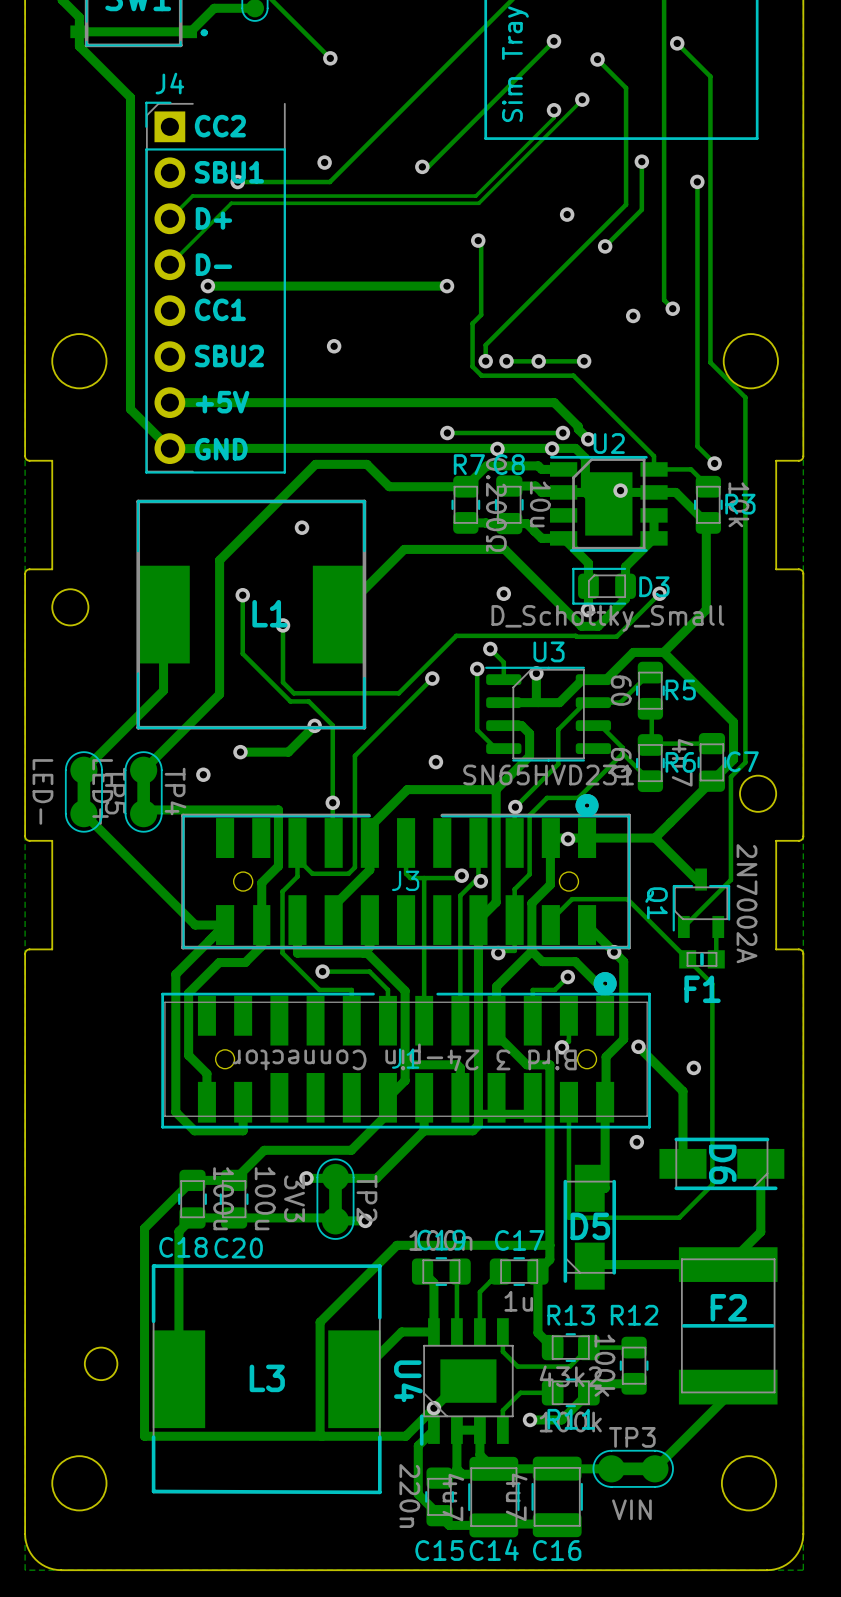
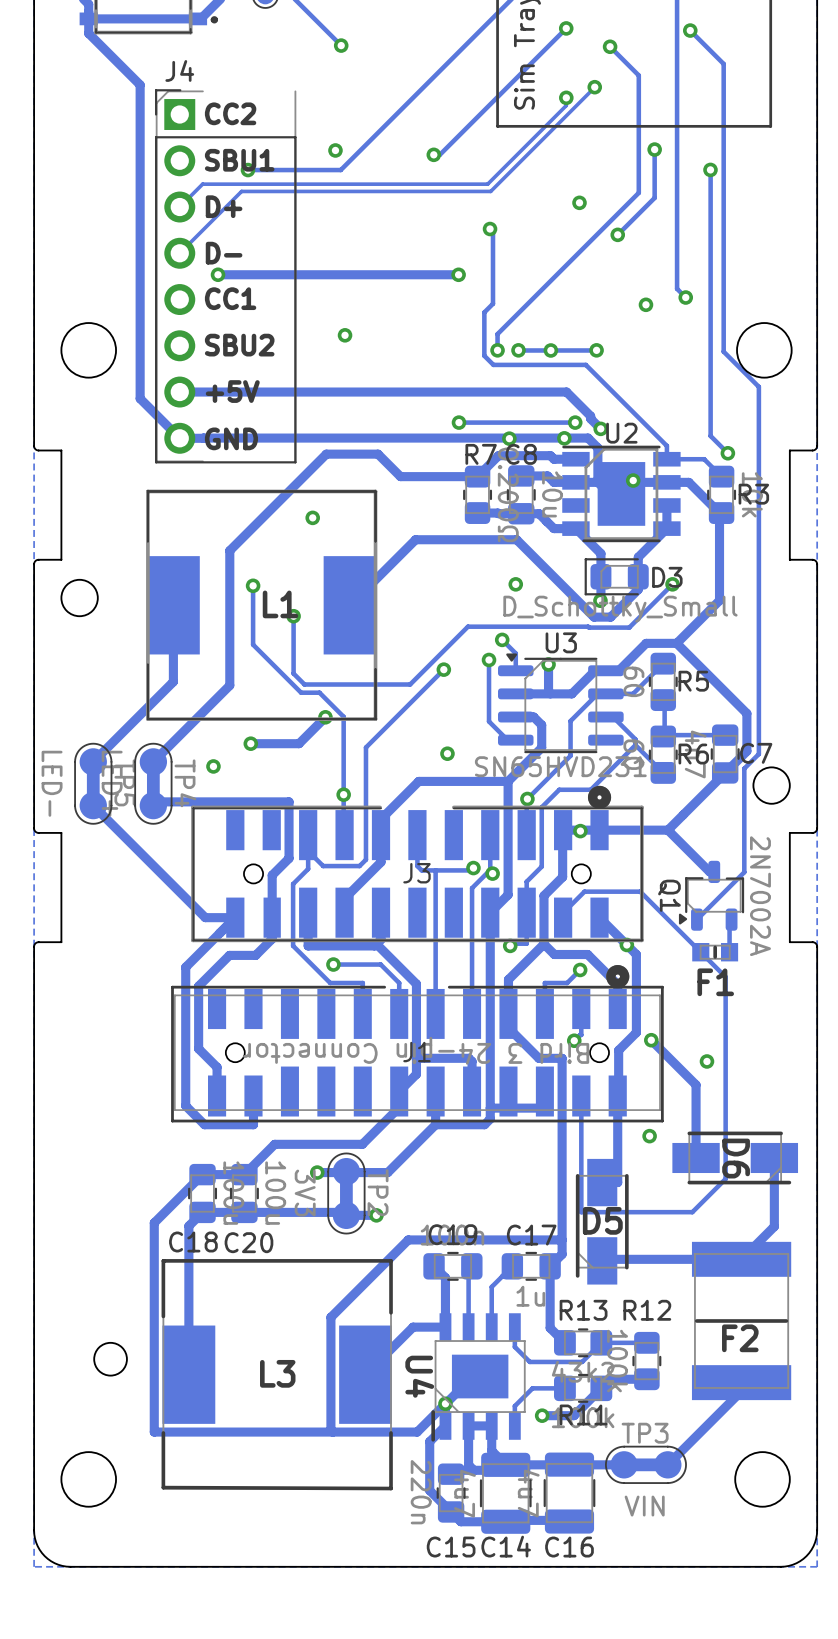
U3 footprint: [485, 666, 612, 762] -> [498, 653, 624, 754]
Q1 footprint: [672, 868, 731, 939] -> [678, 860, 745, 931]
F2 name position: F2 (728, 1307) -> F2 (740, 1338)

